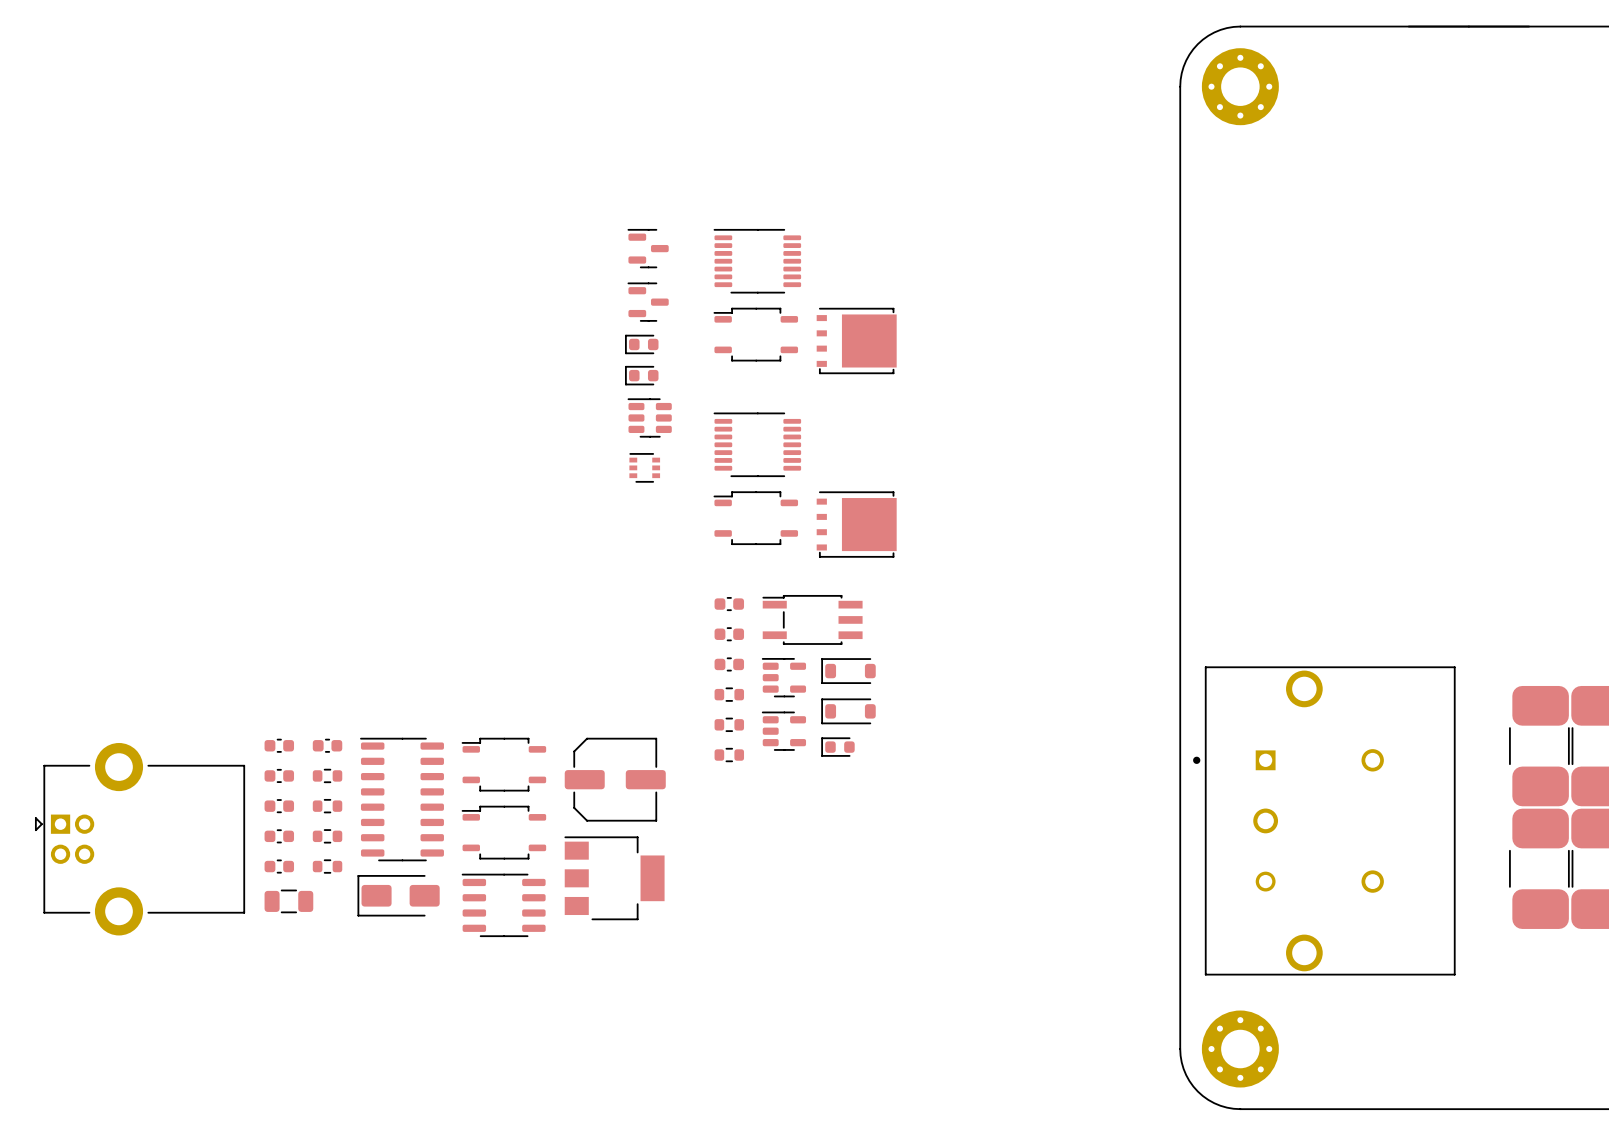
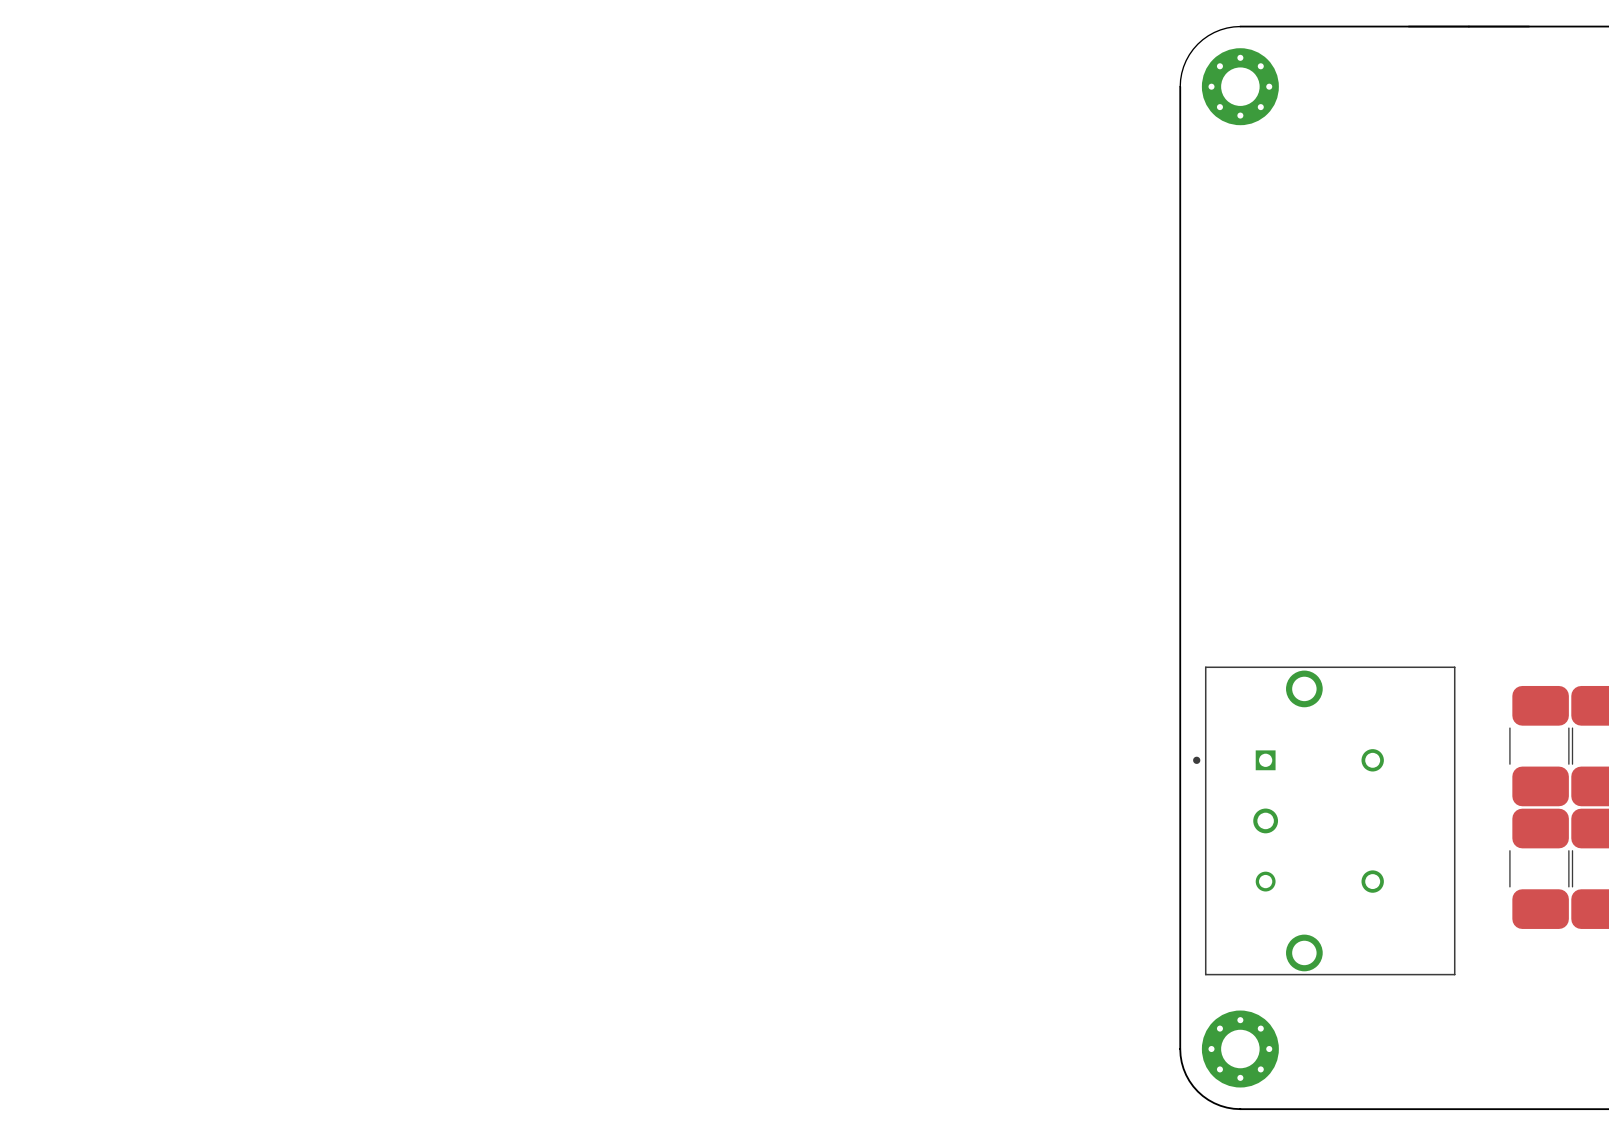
part: (648, 248) -> none
part: (757, 261) -> none
part: (648, 302) -> none
part: (755, 334) -> none
part: (856, 340) -> none
part: (641, 344) -> none
part: (641, 375) -> none
part: (649, 417) -> none
part: (757, 444) -> none
part: (644, 467) -> none
part: (755, 518) -> none
part: (856, 524) -> none
part: (729, 604) -> none
part: (812, 619) -> none
part: (729, 634) -> none
part: (729, 664) -> none
part: (848, 671) -> none
part: (784, 677) -> none
part: (729, 694) -> none
part: (848, 711) -> none
part: (729, 724) -> none
part: (784, 731) -> none
part: (279, 745) -> none
part: (327, 745) -> none
part: (838, 747) -> none
part: (729, 755) -> none
part: (503, 764) -> none
part: (279, 775) -> none
part: (327, 775) -> none
part: (615, 779) -> none
part: (402, 799) -> none
part: (279, 806) -> none
part: (327, 806) -> none
part: (503, 832) -> none
part: (279, 836) -> none
part: (327, 836) -> none
part: (140, 839) -> none
part: (279, 866) -> none
part: (327, 866) -> none
part: (614, 878) -> none
part: (398, 895) -> none
part: (288, 901) -> none
part: (503, 905) -> none

